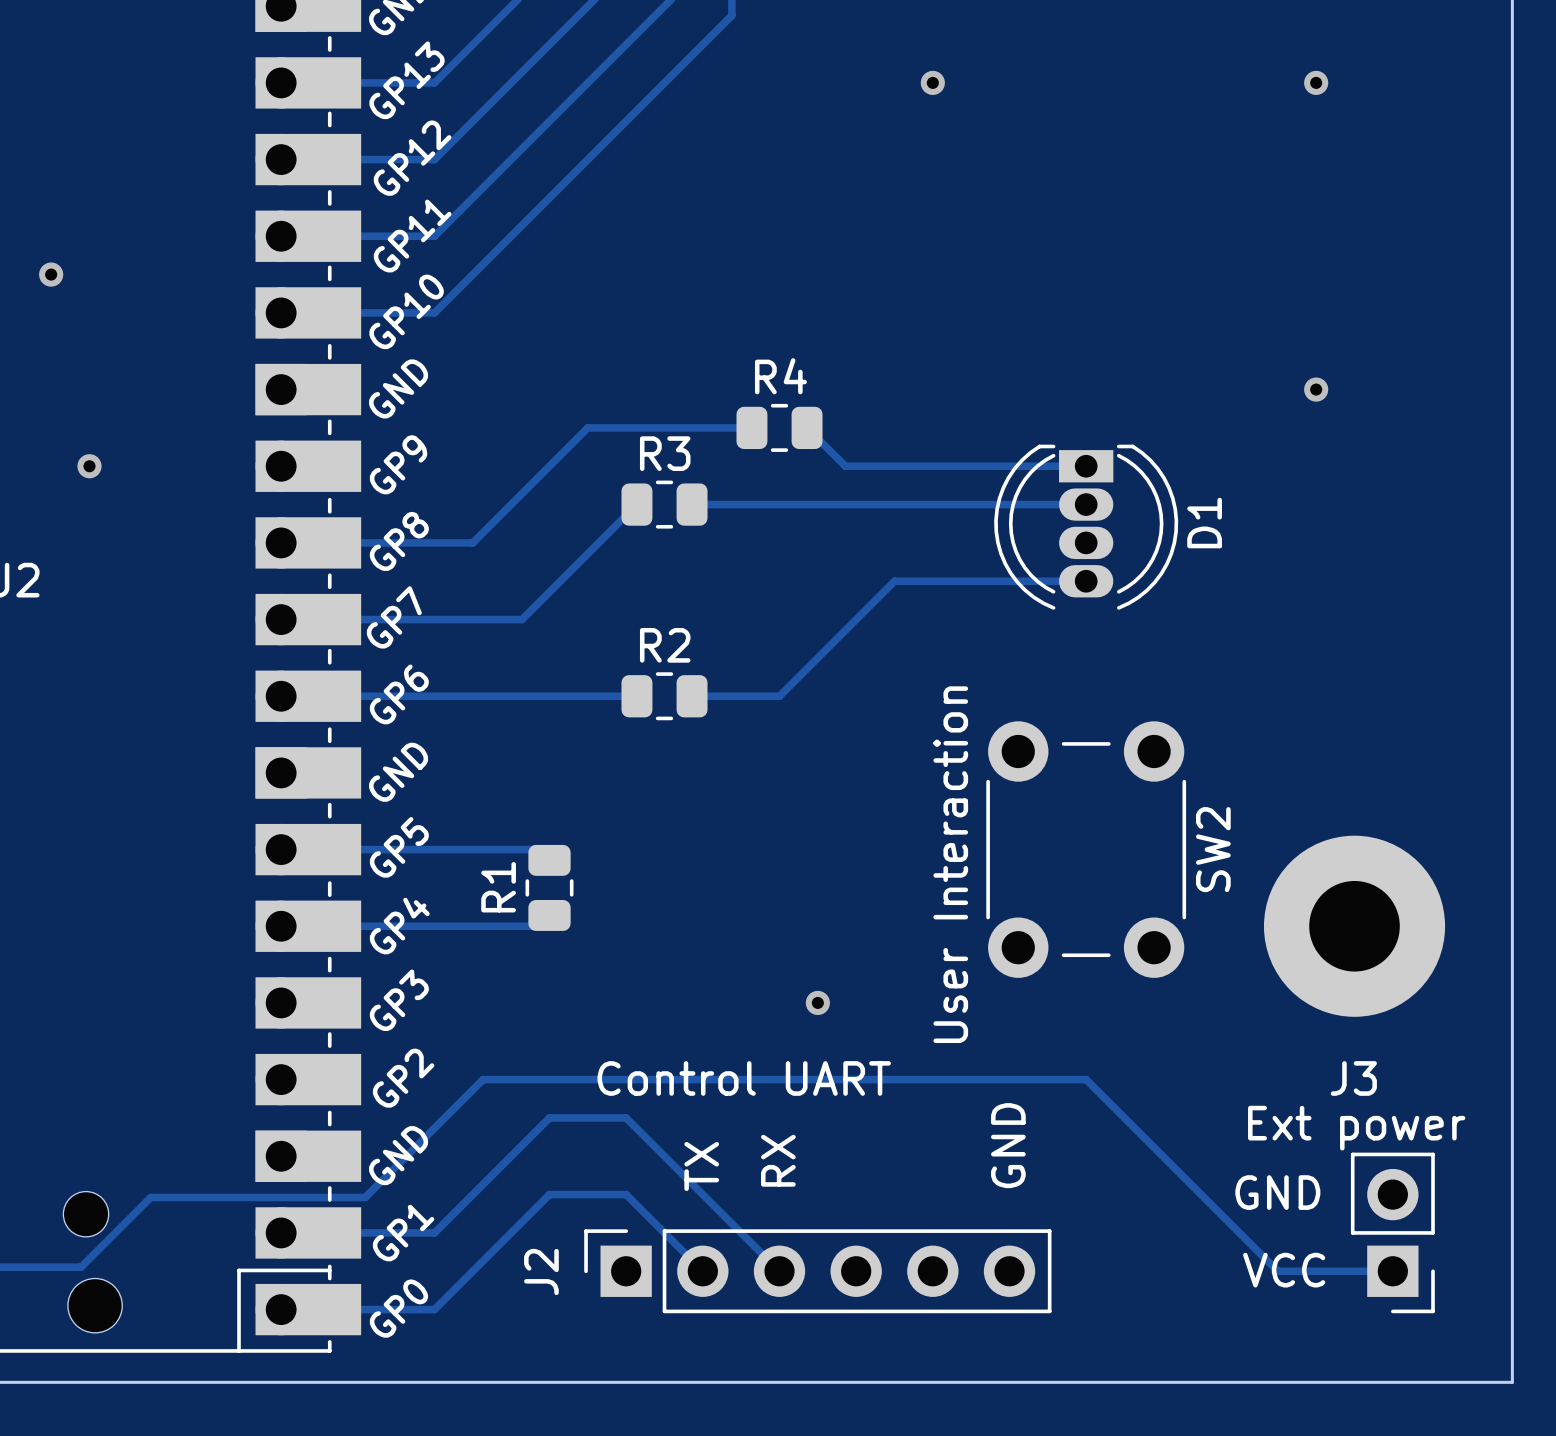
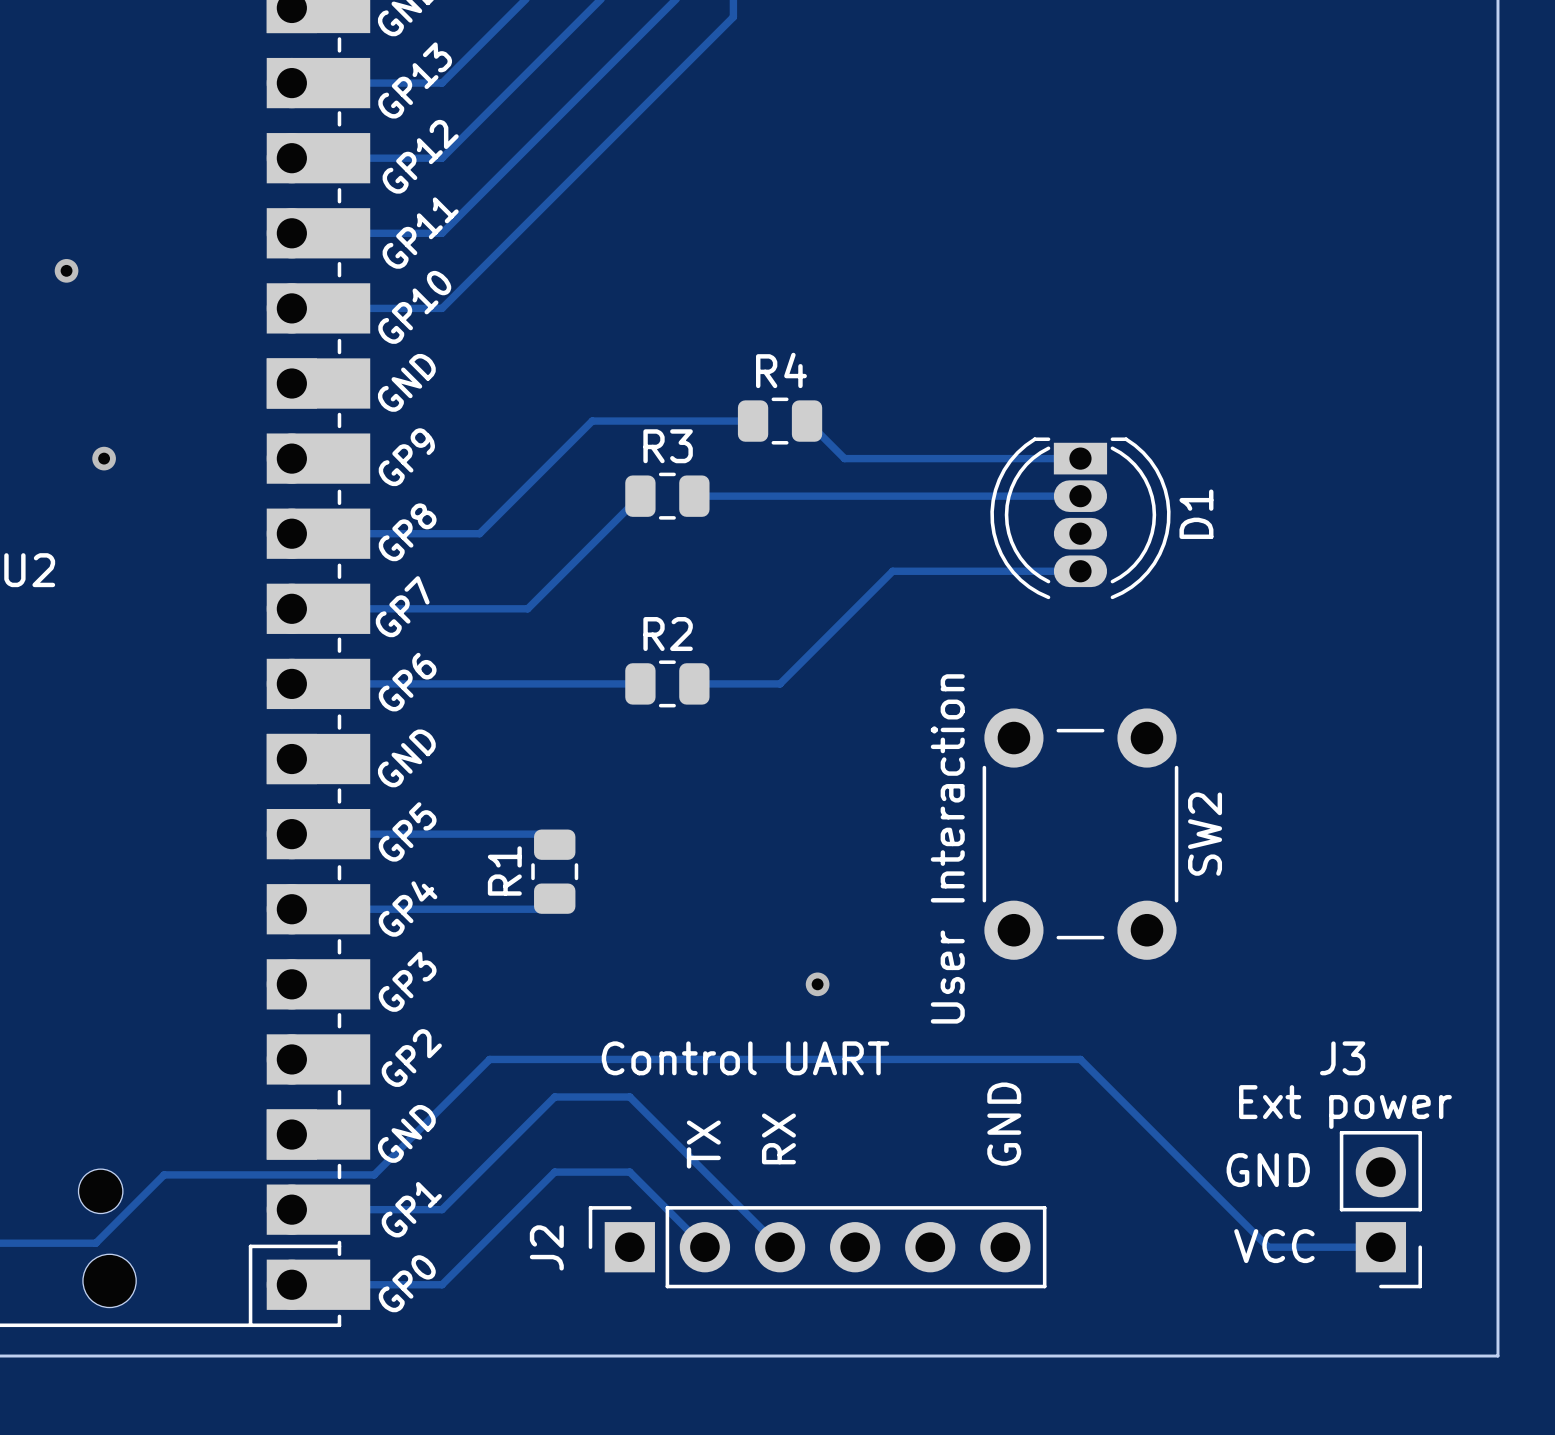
via: (932, 82) -> none
via: (1316, 82) -> none
via: (1316, 389) -> none
part: (1354, 926) -> none

